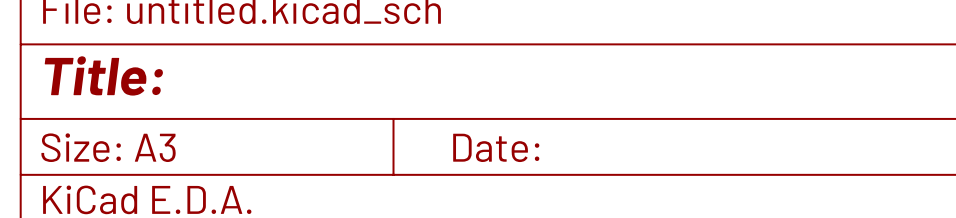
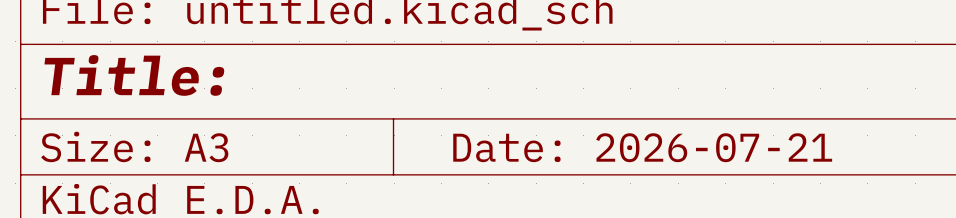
title block: Date: (496, 147) -> Date: 2026-07-21 (642, 147)

